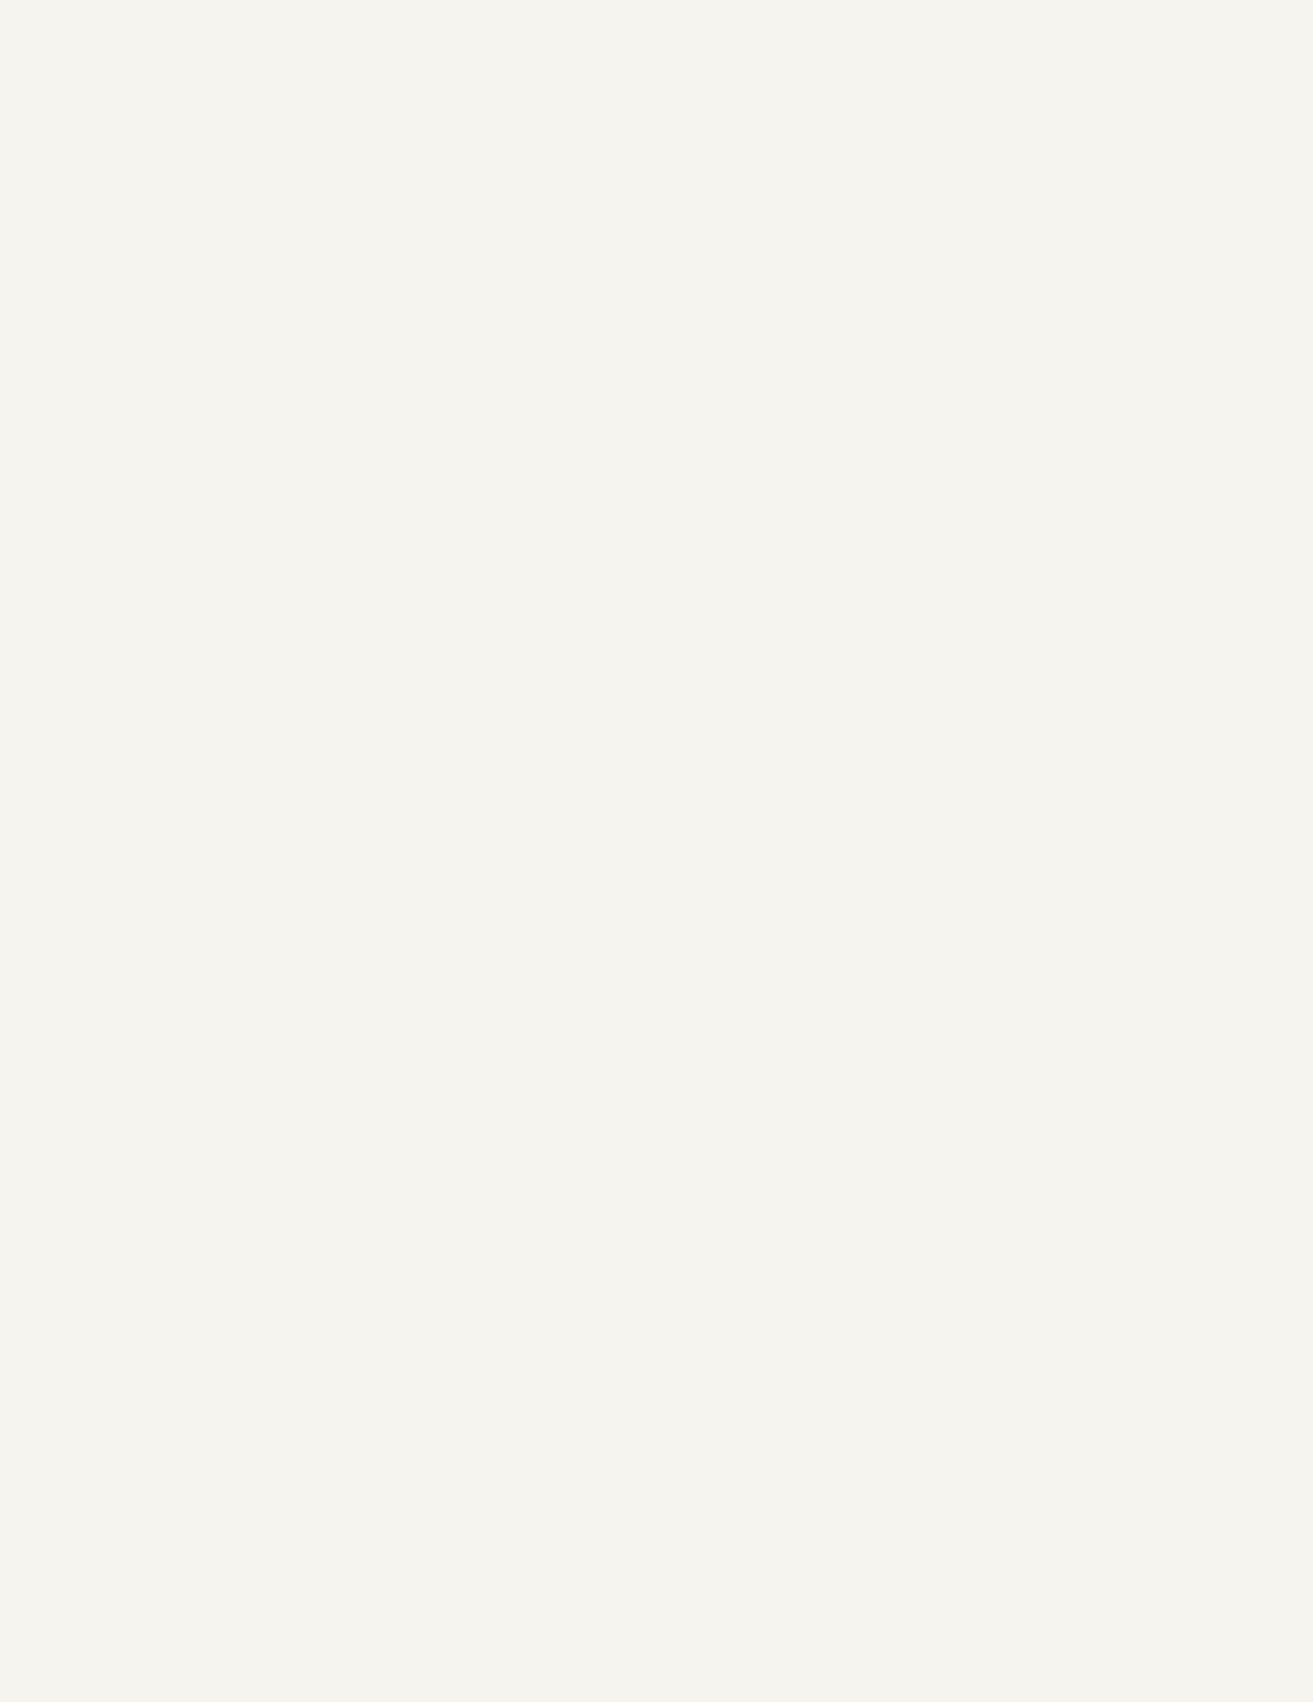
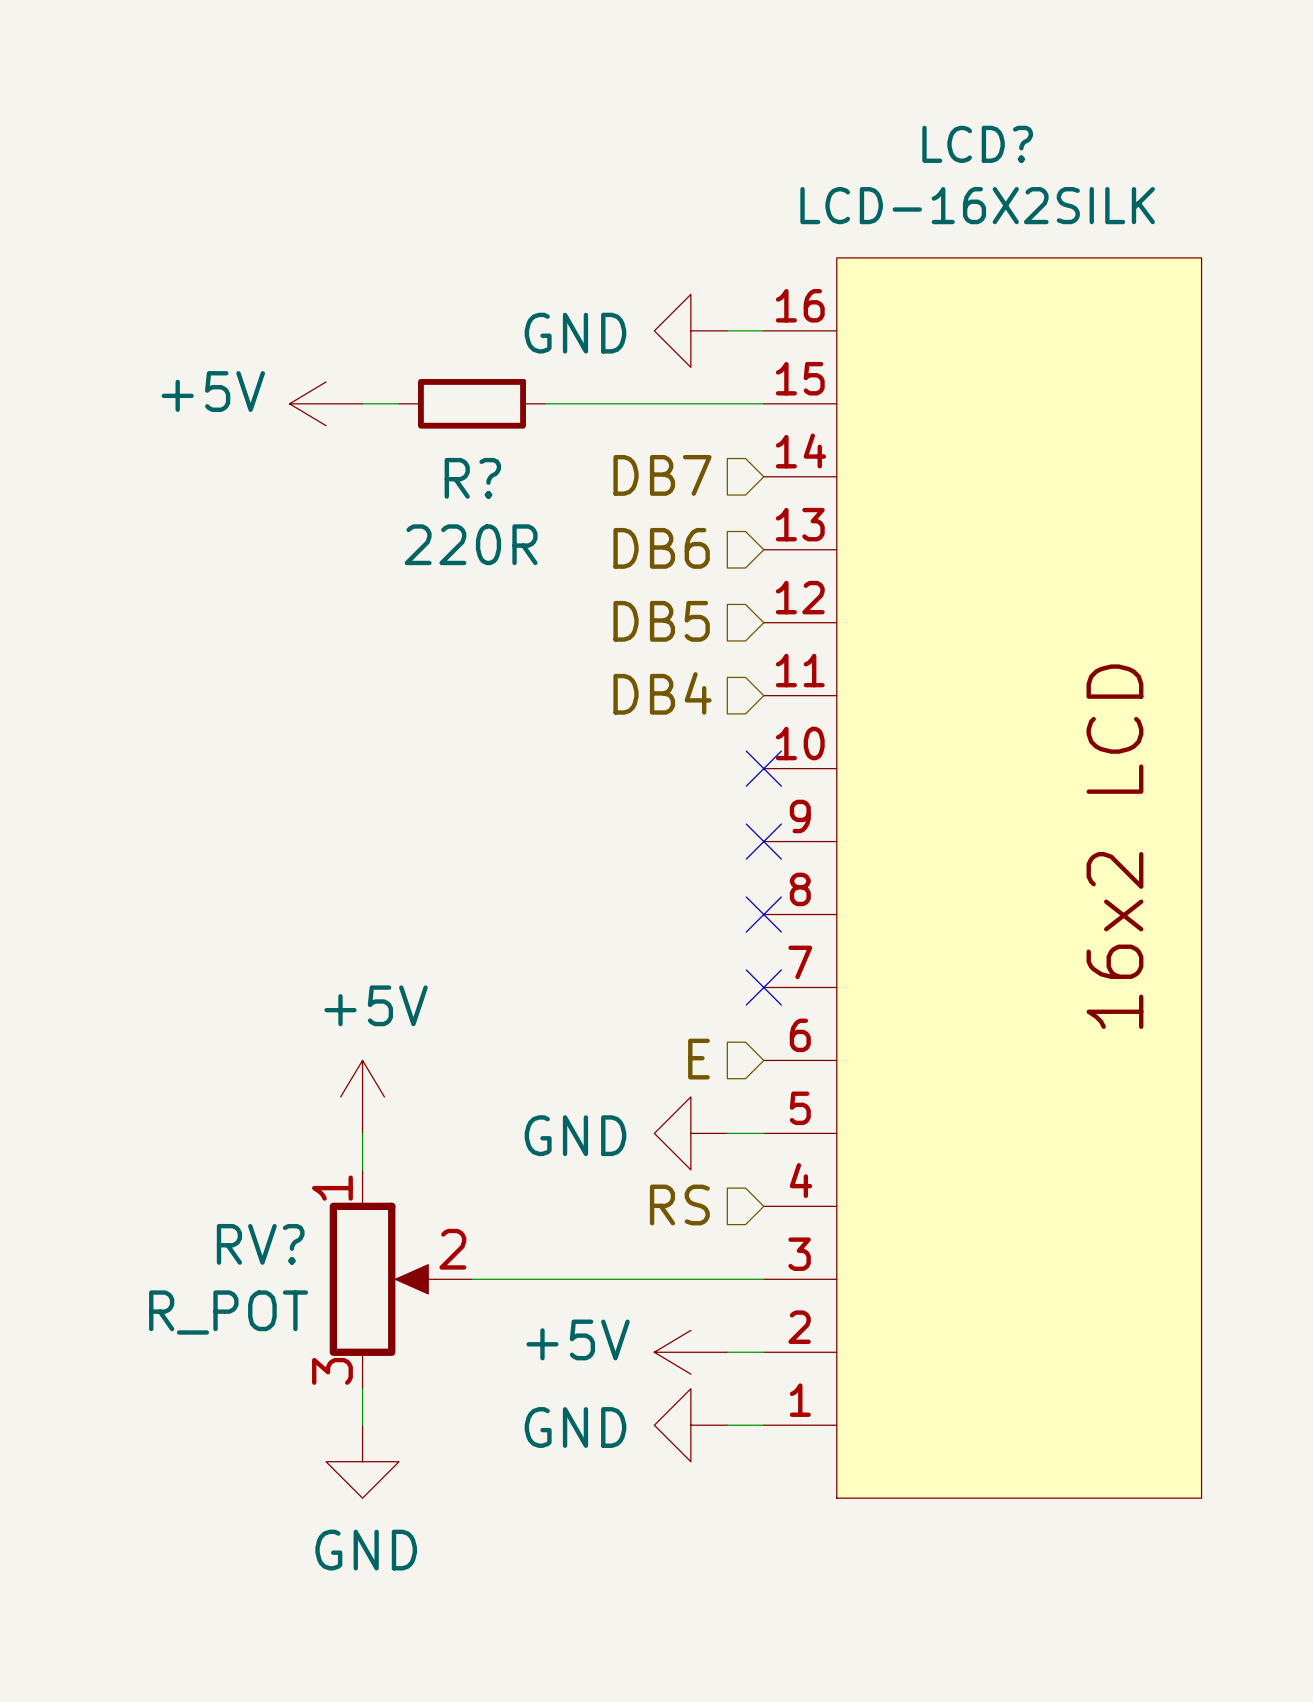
power symbol: none -> GND (690, 330)
wire: none -> (727, 330) (763, 330)
power symbol: none -> +5V (326, 403)
wire: none -> (362, 403) (399, 403)
R?: none -> 220R (471, 403)
wire: none -> (544, 403) (763, 403)
hierarchical label: none -> DB7 (662, 475)
hierarchical label: none -> DB6 (661, 548)
hierarchical label: none -> DB5 (661, 621)
hierarchical label: none -> DB4 (662, 693)
no-connect mark: none -> (763, 768)
no-connect mark: none -> (763, 841)
LCD?: none -> LCD-16X2SILK (982, 878)
no-connect mark: none -> (763, 914)
no-connect mark: none -> (763, 987)
hierarchical label: none -> E (698, 1059)
power symbol: none -> +5V (362, 1096)
wire: none -> (362, 1133) (362, 1169)
power symbol: none -> GND (690, 1133)
wire: none -> (727, 1133) (763, 1133)
hierarchical label: none -> RS (679, 1204)
RV?: none -> R_POT (400, 1279)
wire: none -> (471, 1279) (763, 1279)
power symbol: none -> +5V (690, 1352)
wire: none -> (727, 1352) (763, 1352)
wire: none -> (362, 1388) (362, 1425)
power symbol: none -> GND (690, 1425)
wire: none -> (727, 1425) (763, 1425)
power symbol: none -> GND (362, 1461)

